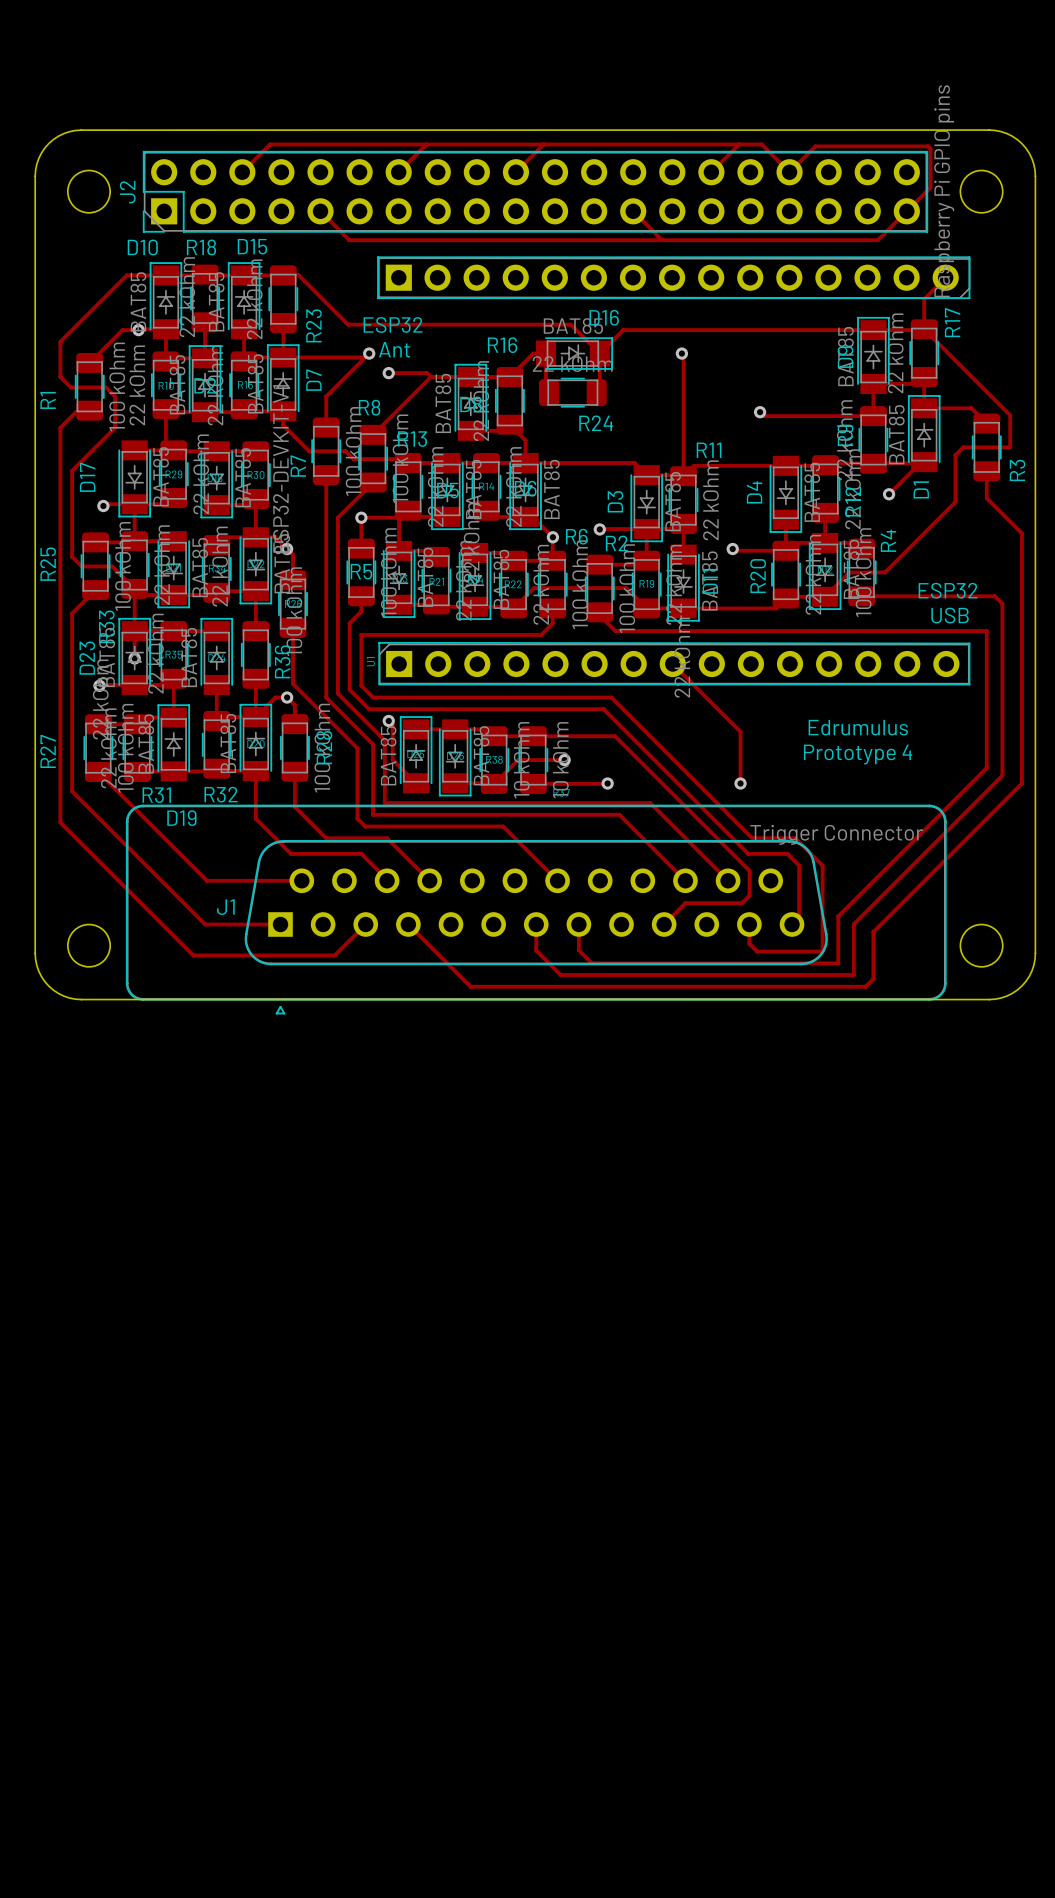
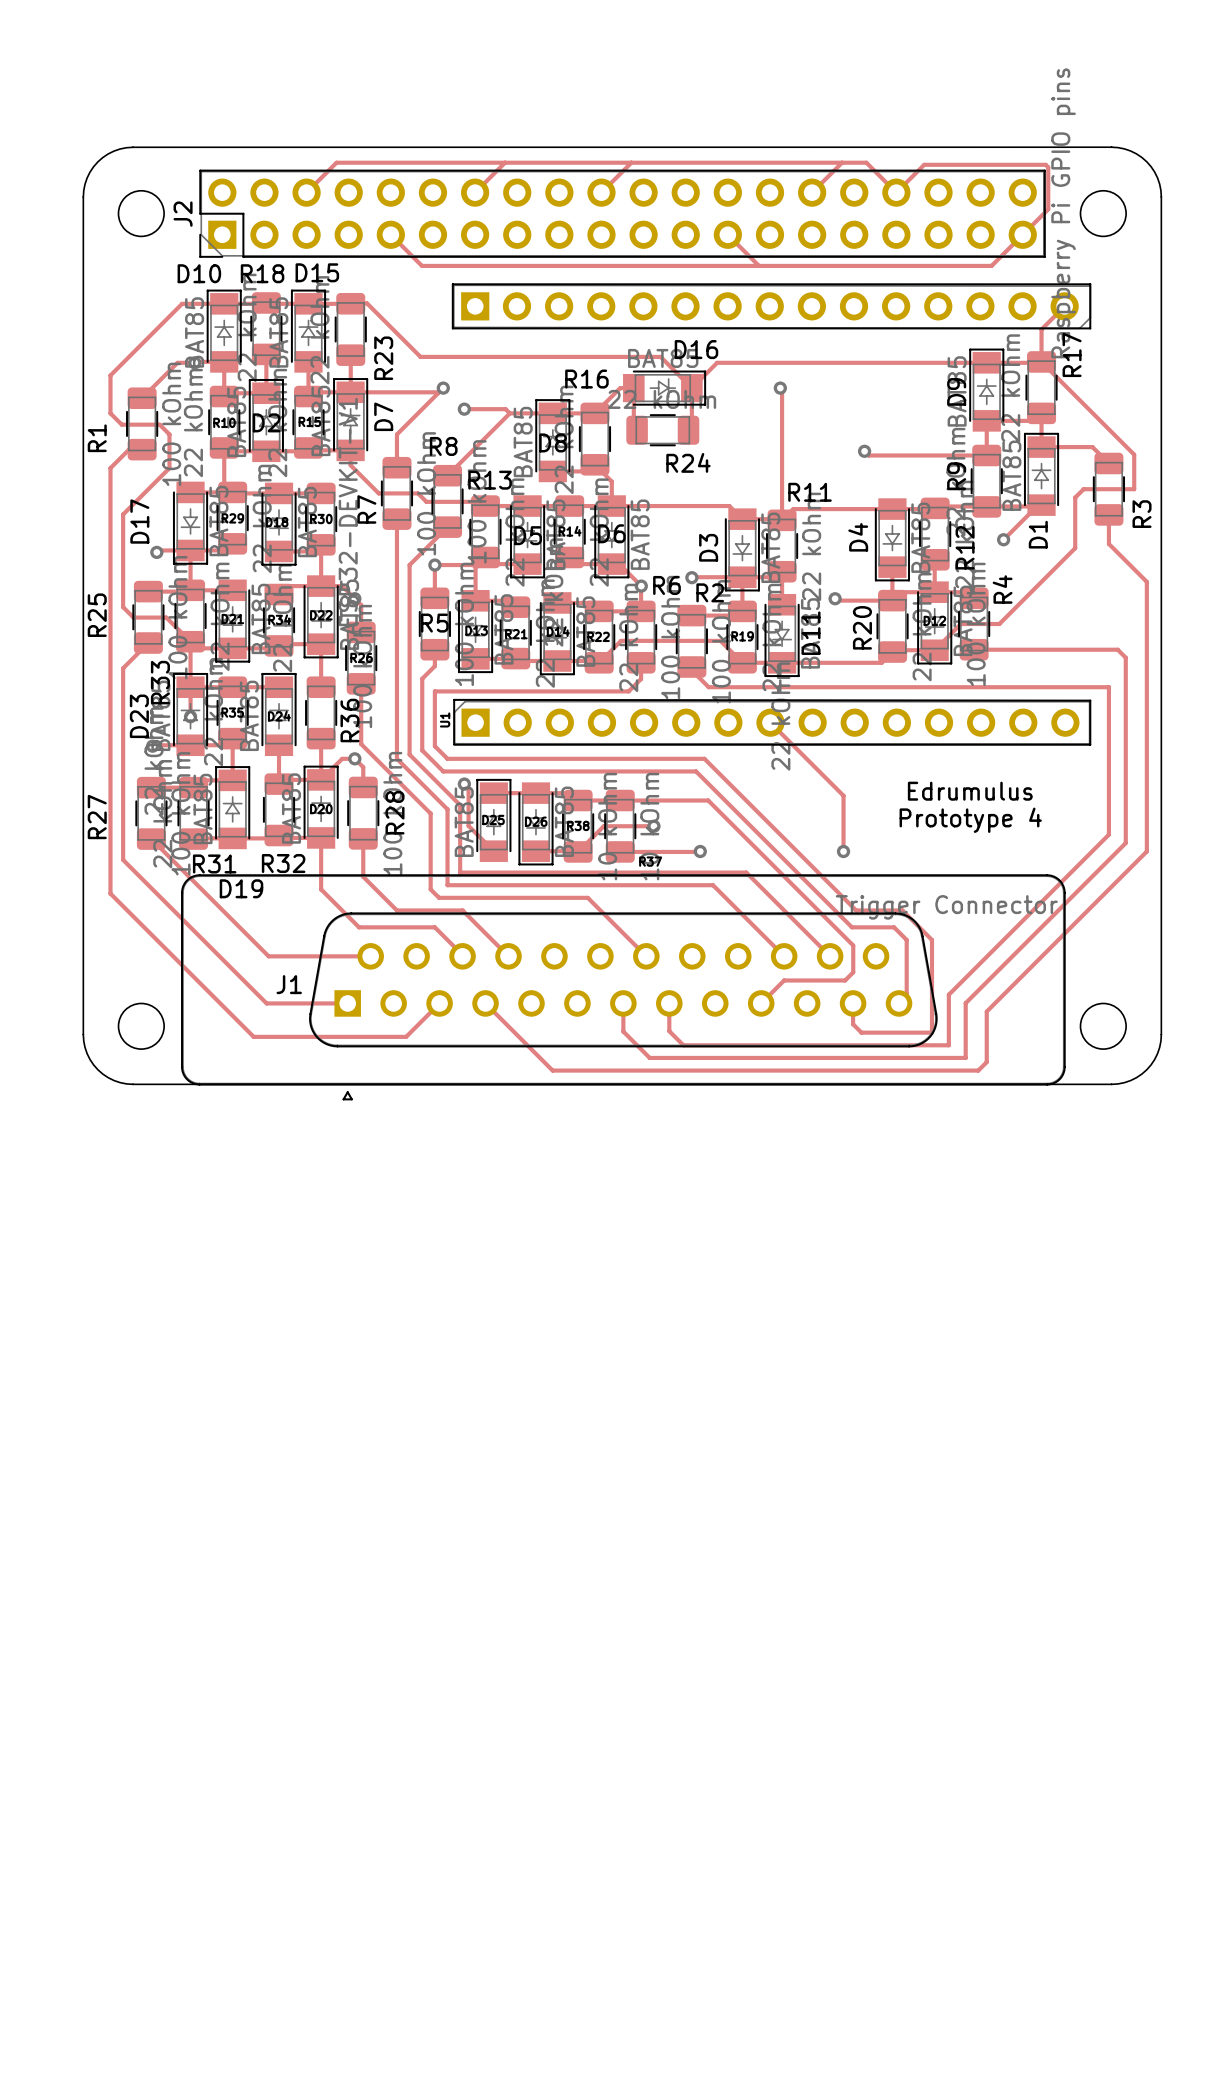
text: ESP32 (393, 324) -> none
text: Ant (394, 349) -> none
text: ESP32 (948, 590) -> none
text: USB (950, 615) -> none

